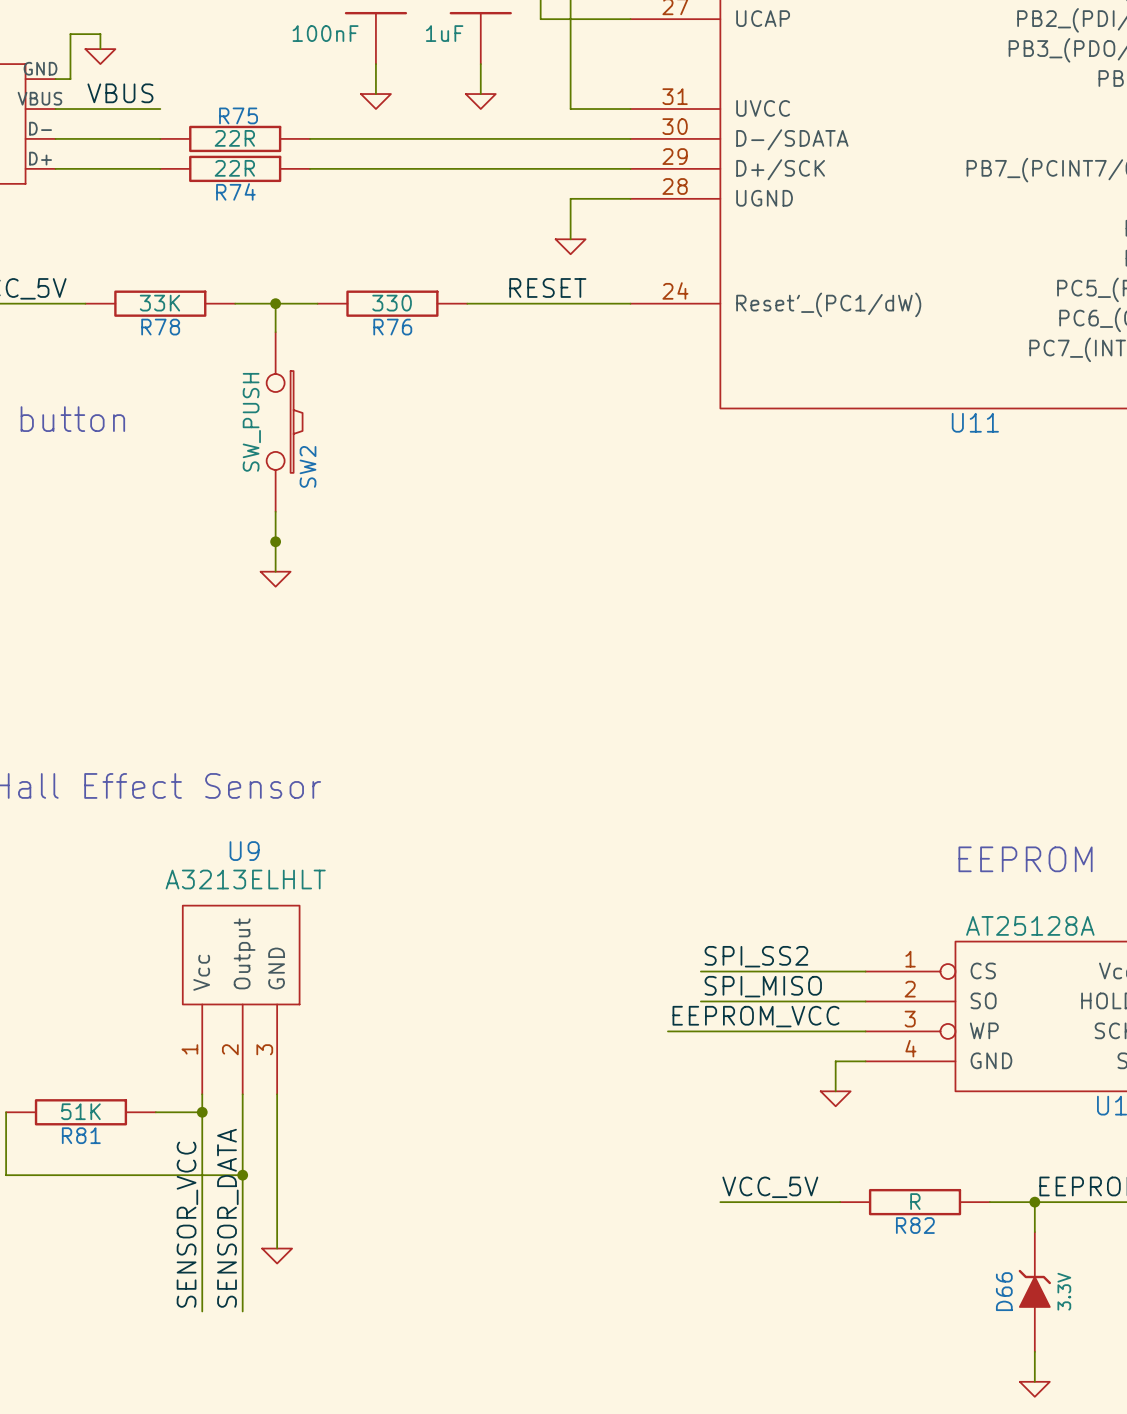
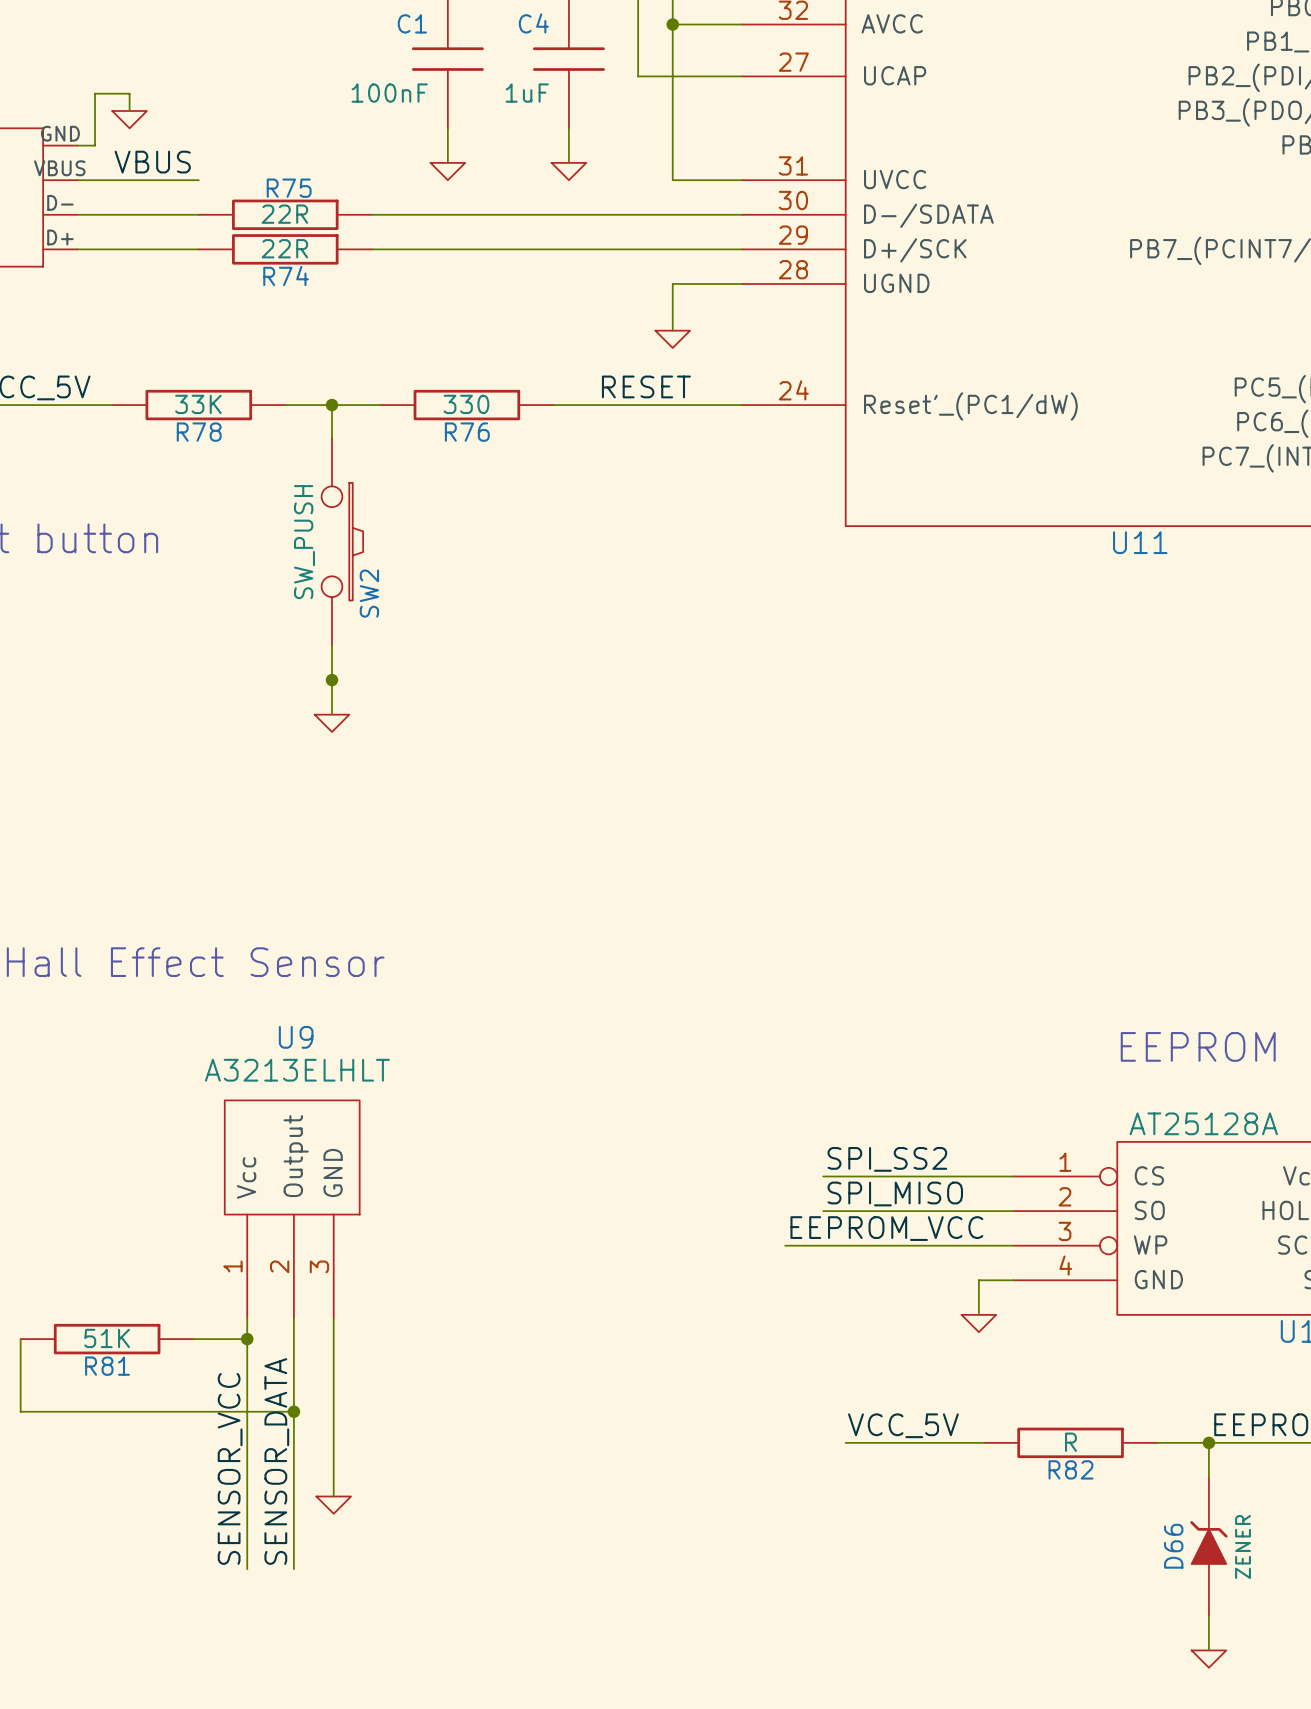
D66 value: 3.3V (1064, 1291) -> ZENER (1243, 1546)

